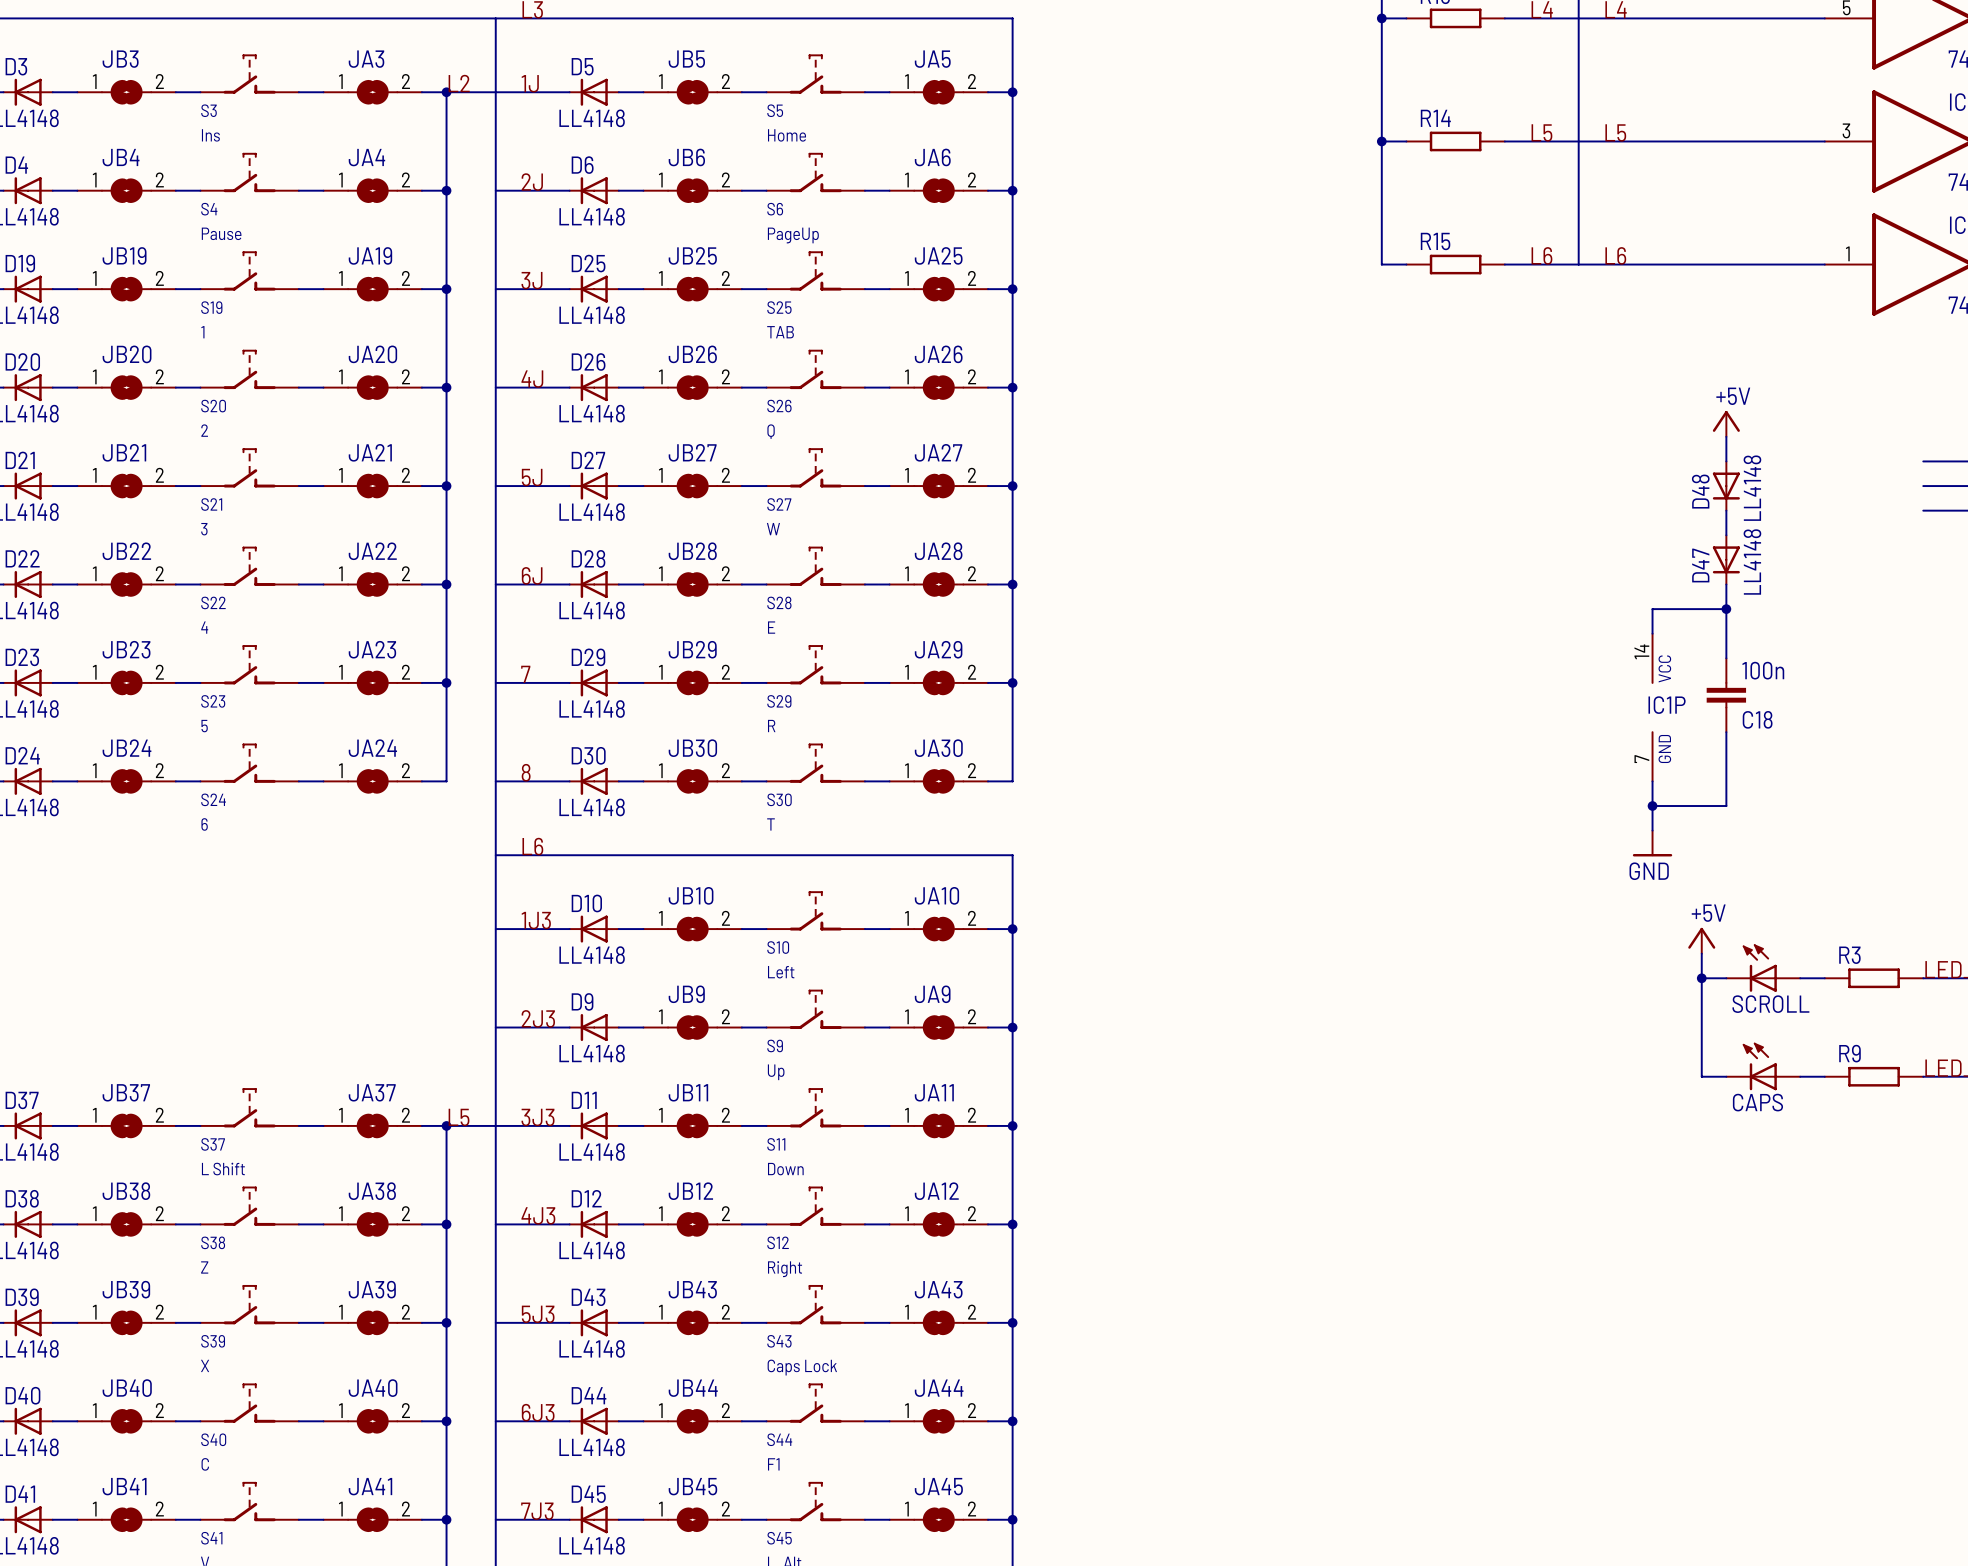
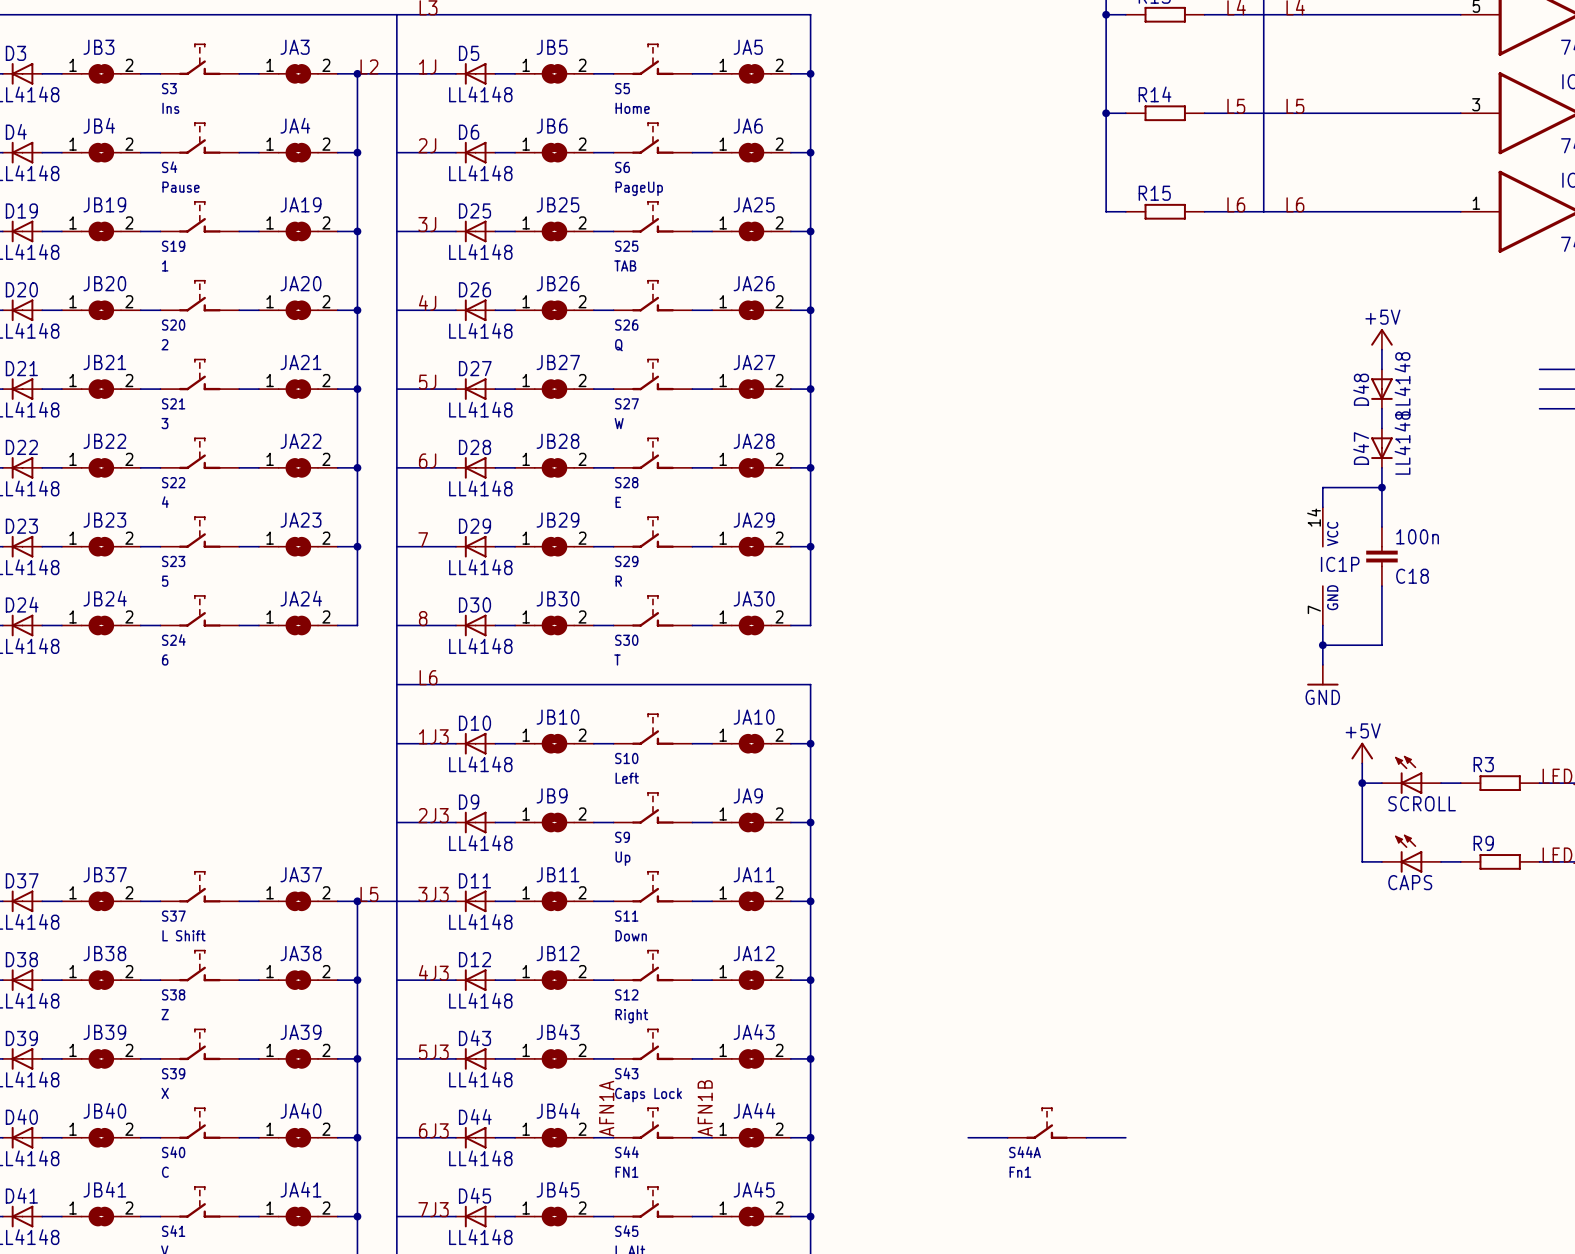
label: none -> AFN1A (606, 1108)
label: none -> AFN1B (705, 1108)
S44A: none -> Fn1 (1047, 1123)
wire: none -> (968, 1137) (1007, 1137)
wire: none -> (1086, 1137) (1125, 1137)
S44 value: F1 (773, 1464) -> FN1 (626, 1172)

